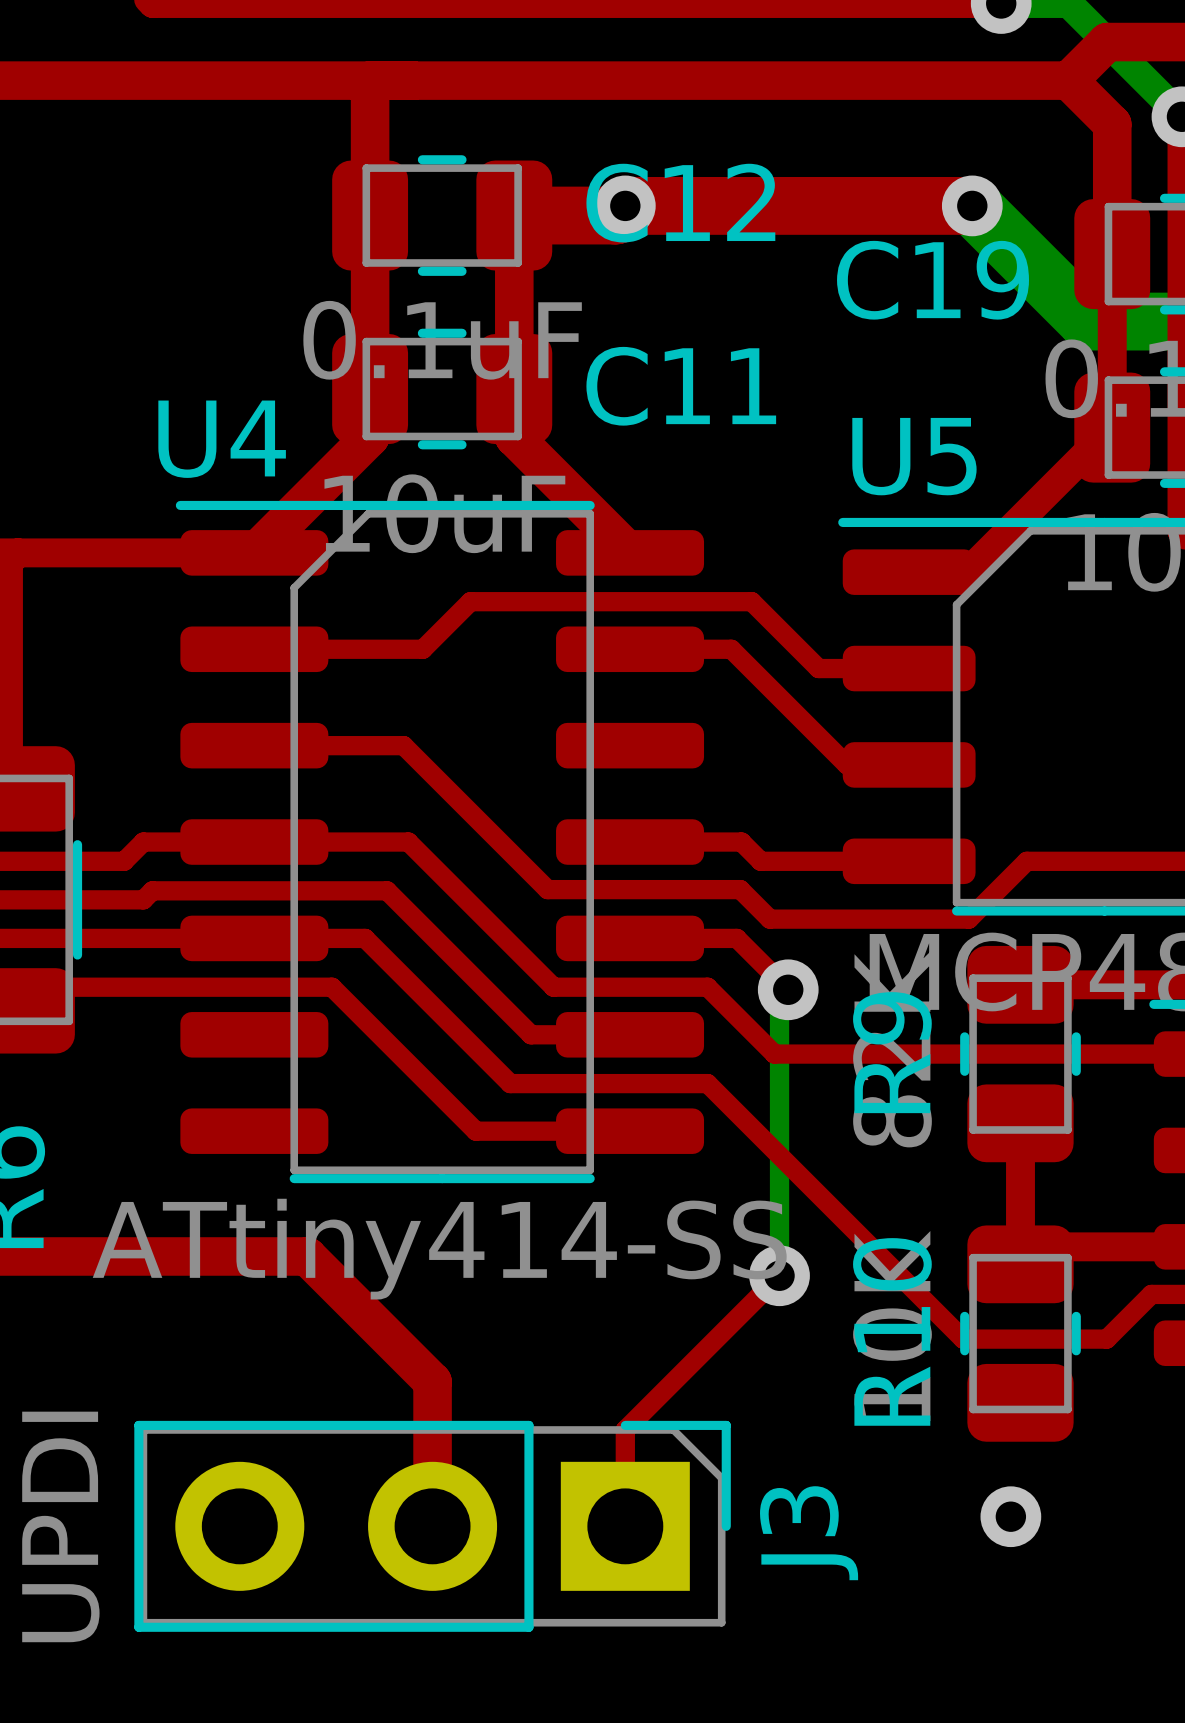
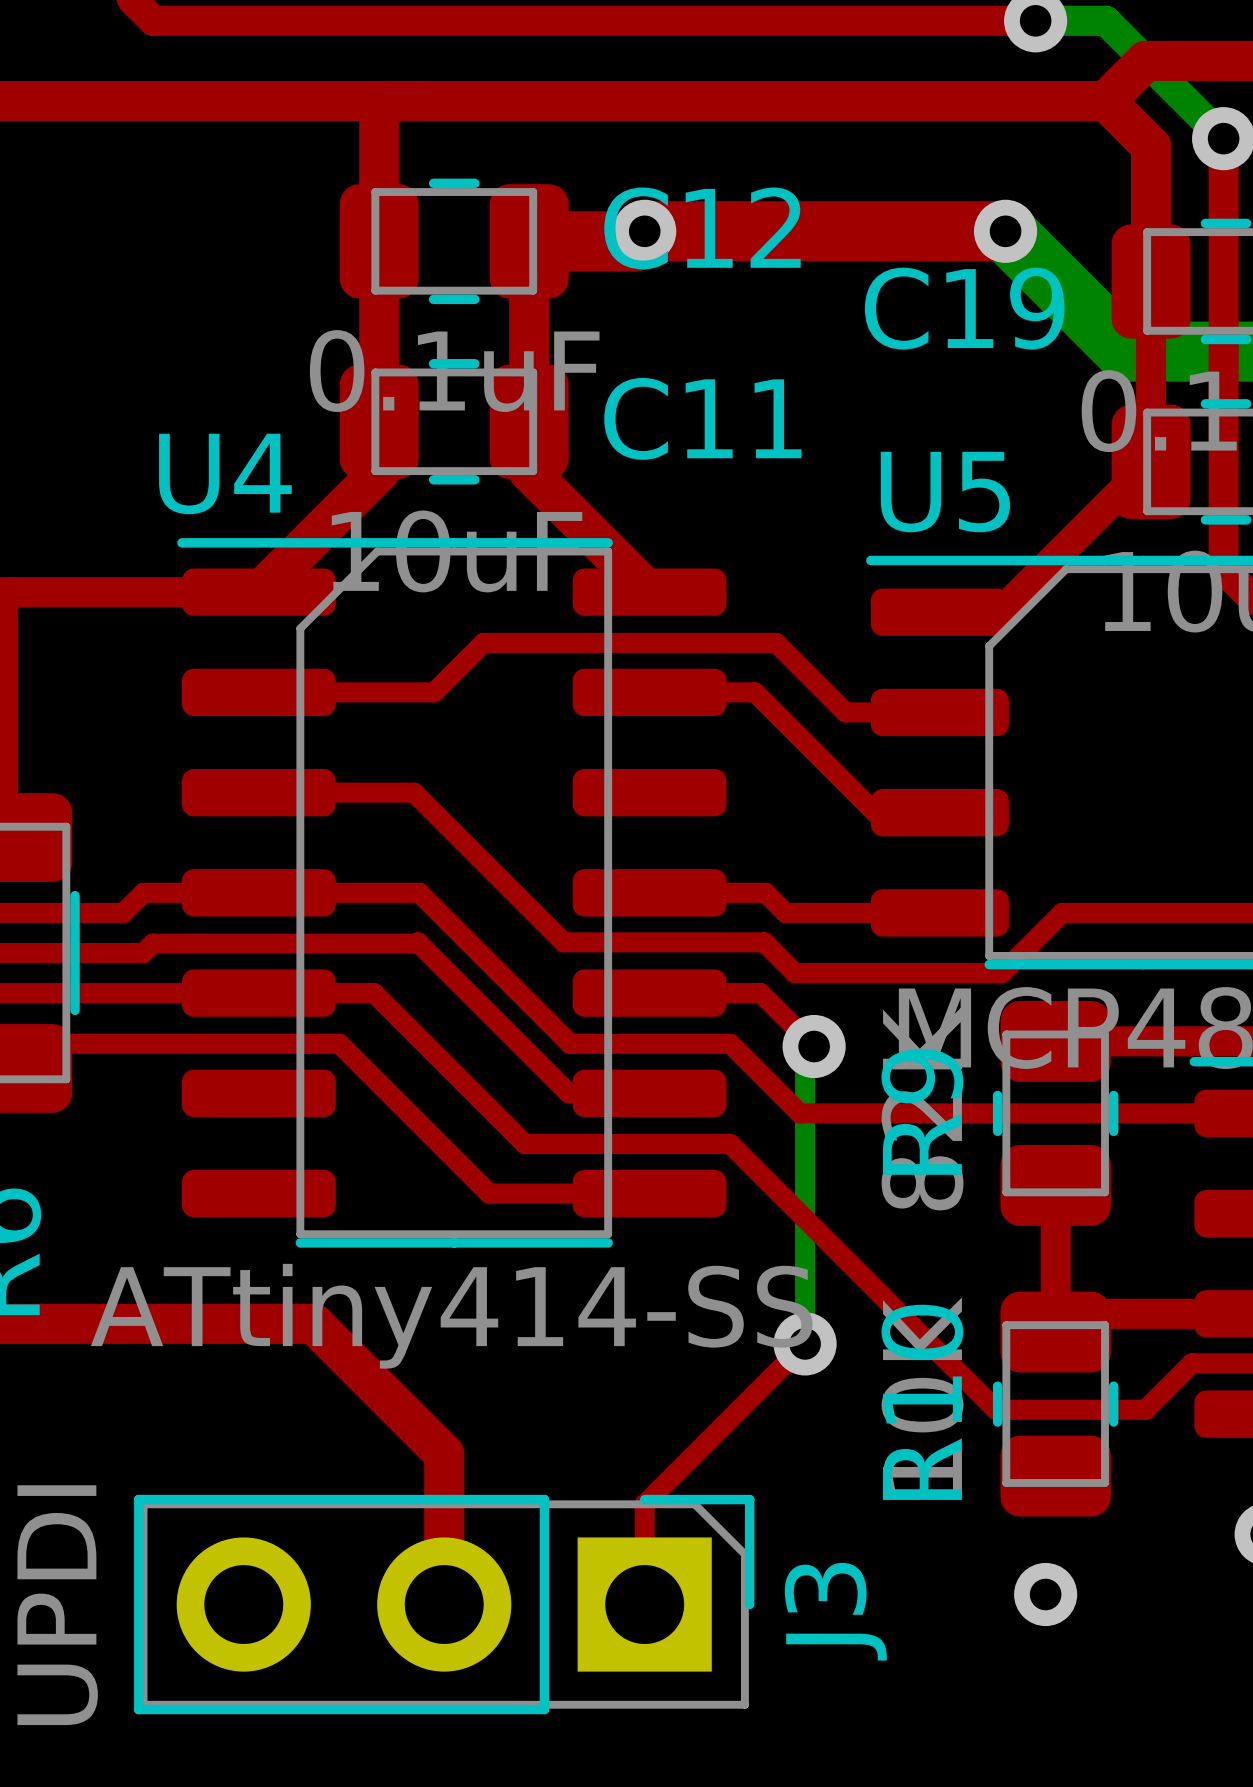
top track: (387, 890) (531, 1034) (552, 1034) -> (396, 943) (417, 942) (568, 1093)

